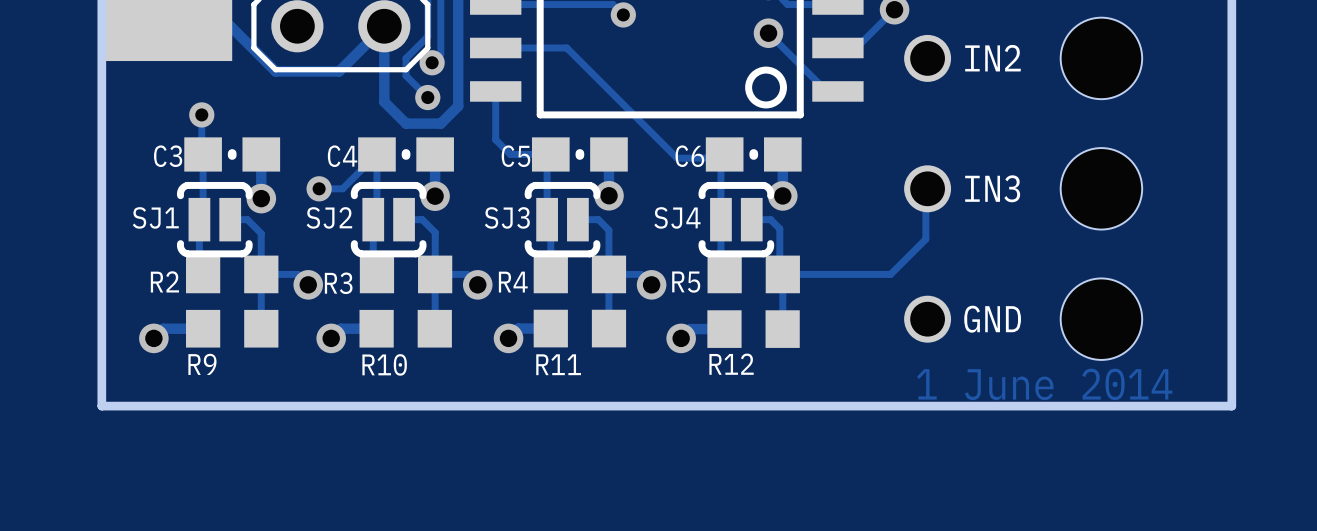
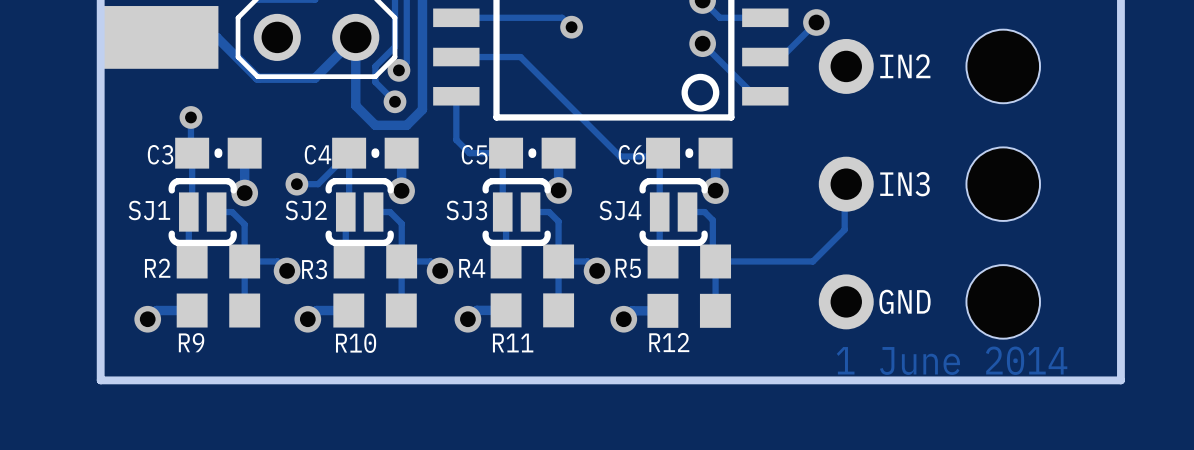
IN2 footprint: [904, 17, 1143, 100] -> [818, 29, 1041, 104]
IN3 footprint: [904, 148, 1143, 230] -> [818, 147, 1041, 221]
GND footprint: [904, 278, 1143, 360] -> [818, 265, 1041, 339]

